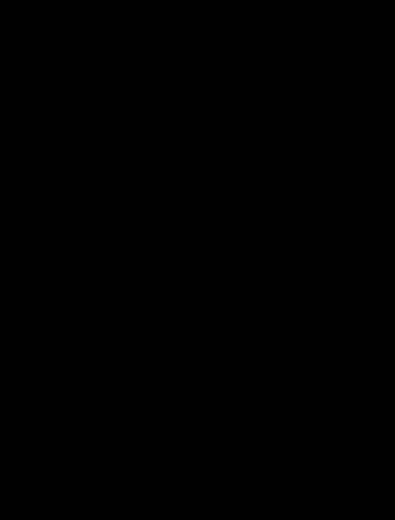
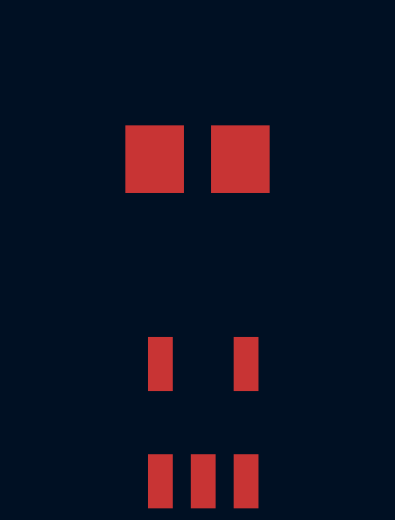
part: none -> (197, 159)
part: none -> (203, 422)

